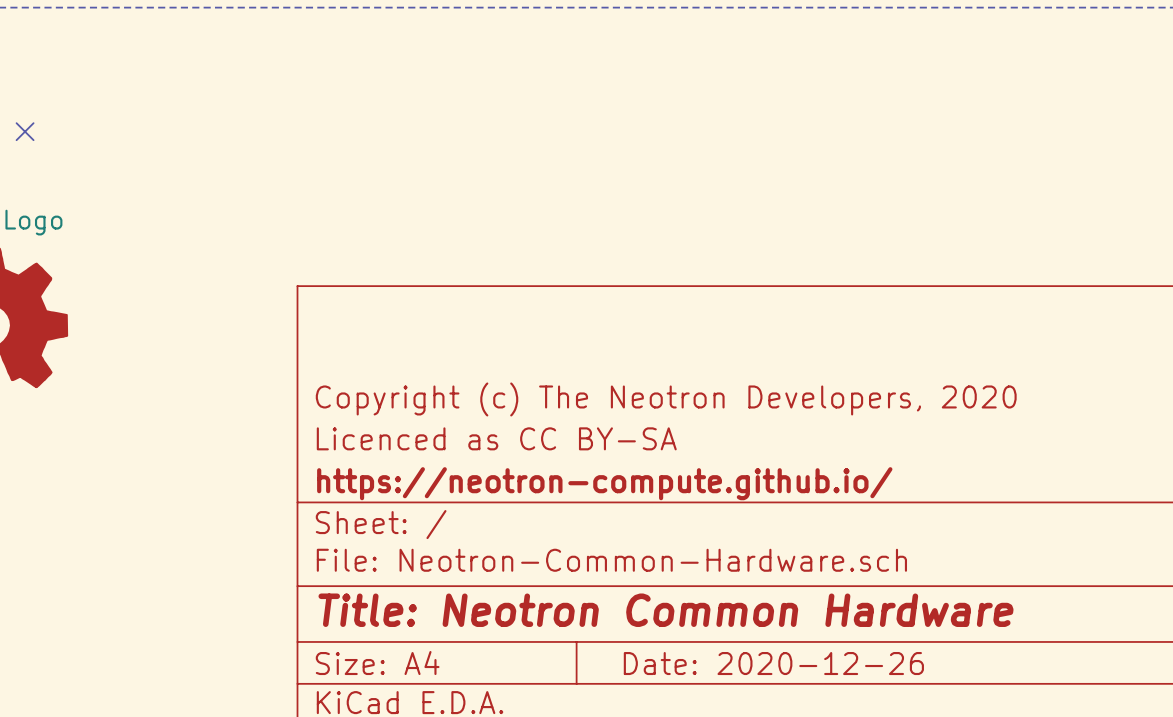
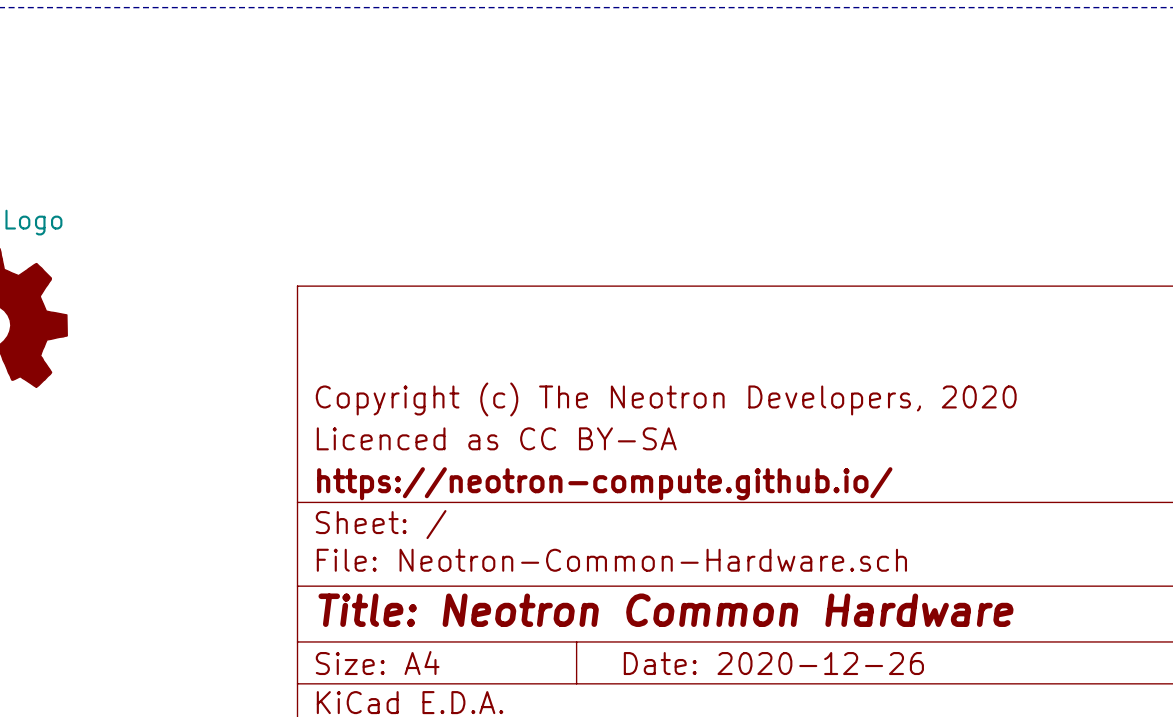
no-connect mark: (25, 131) -> none

